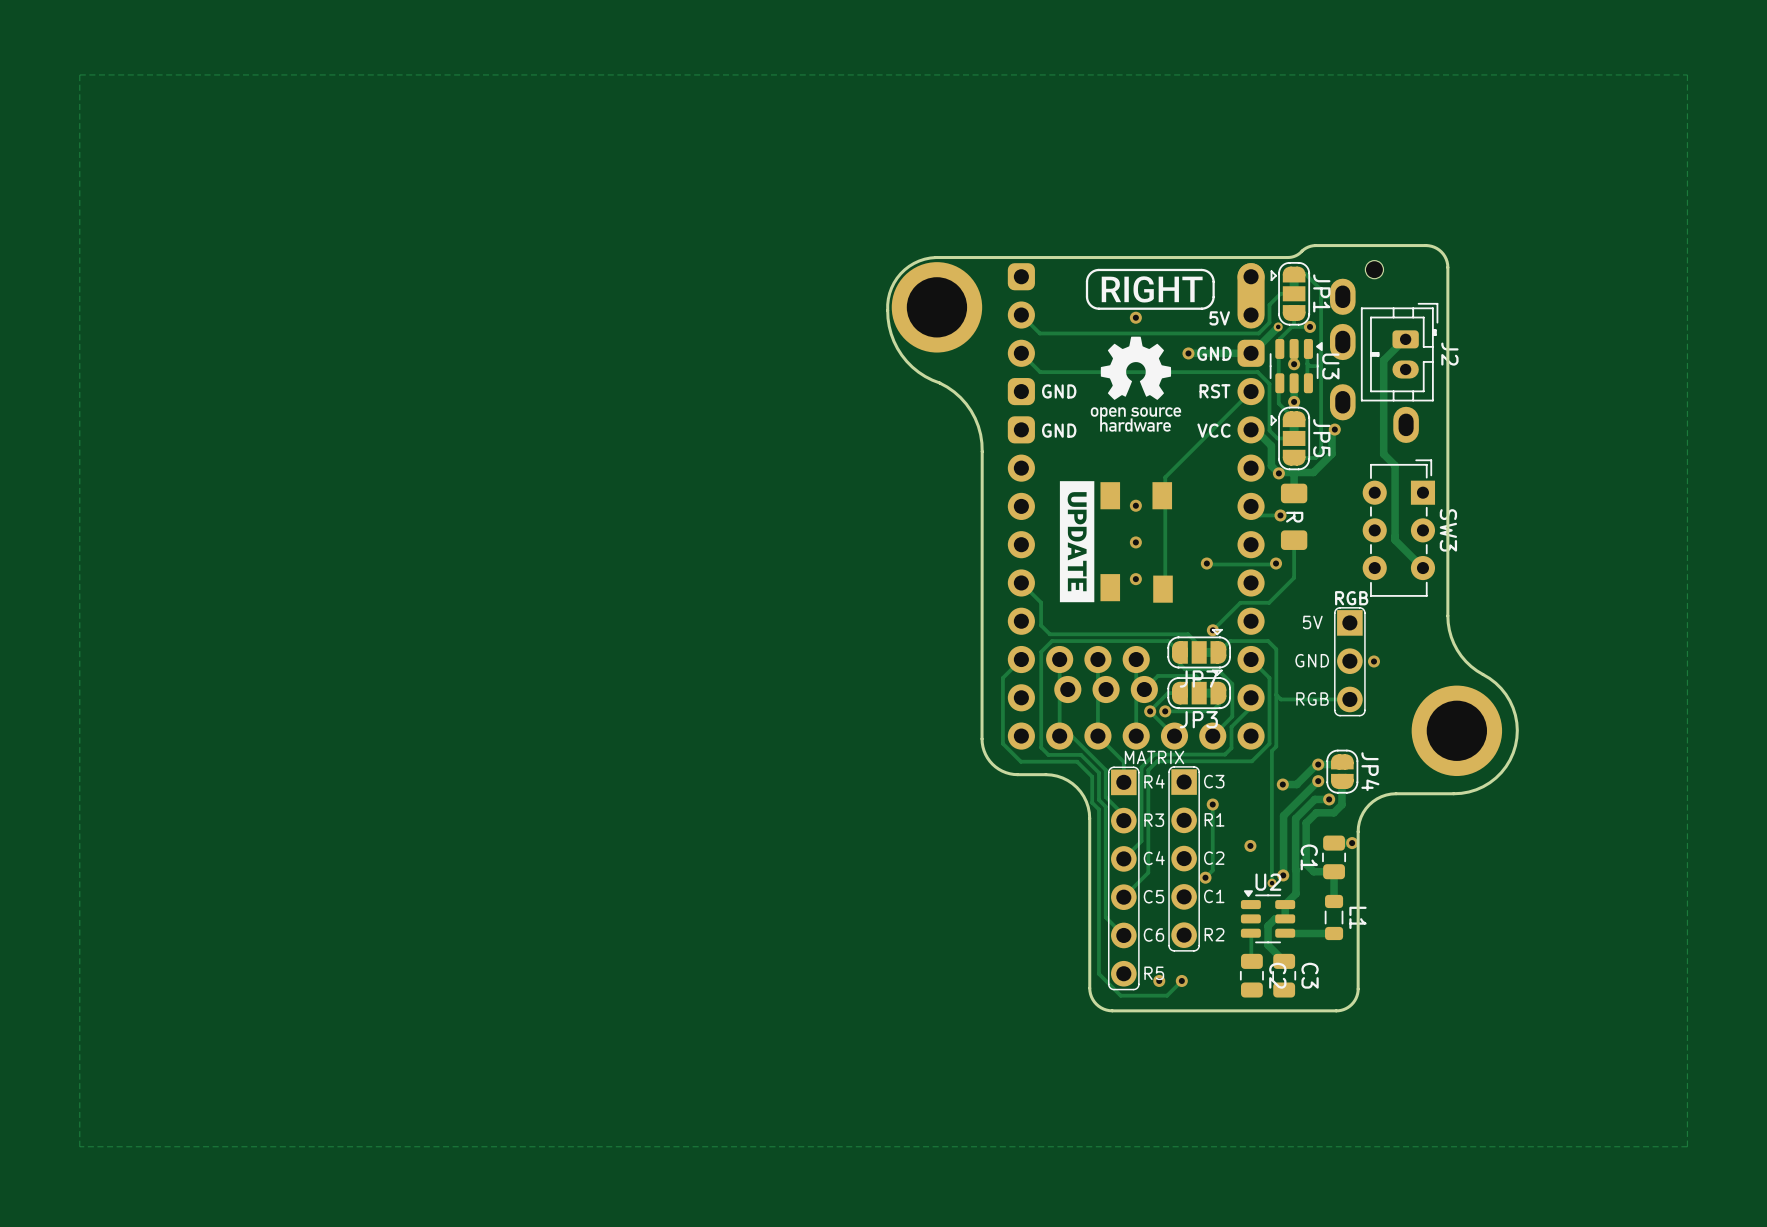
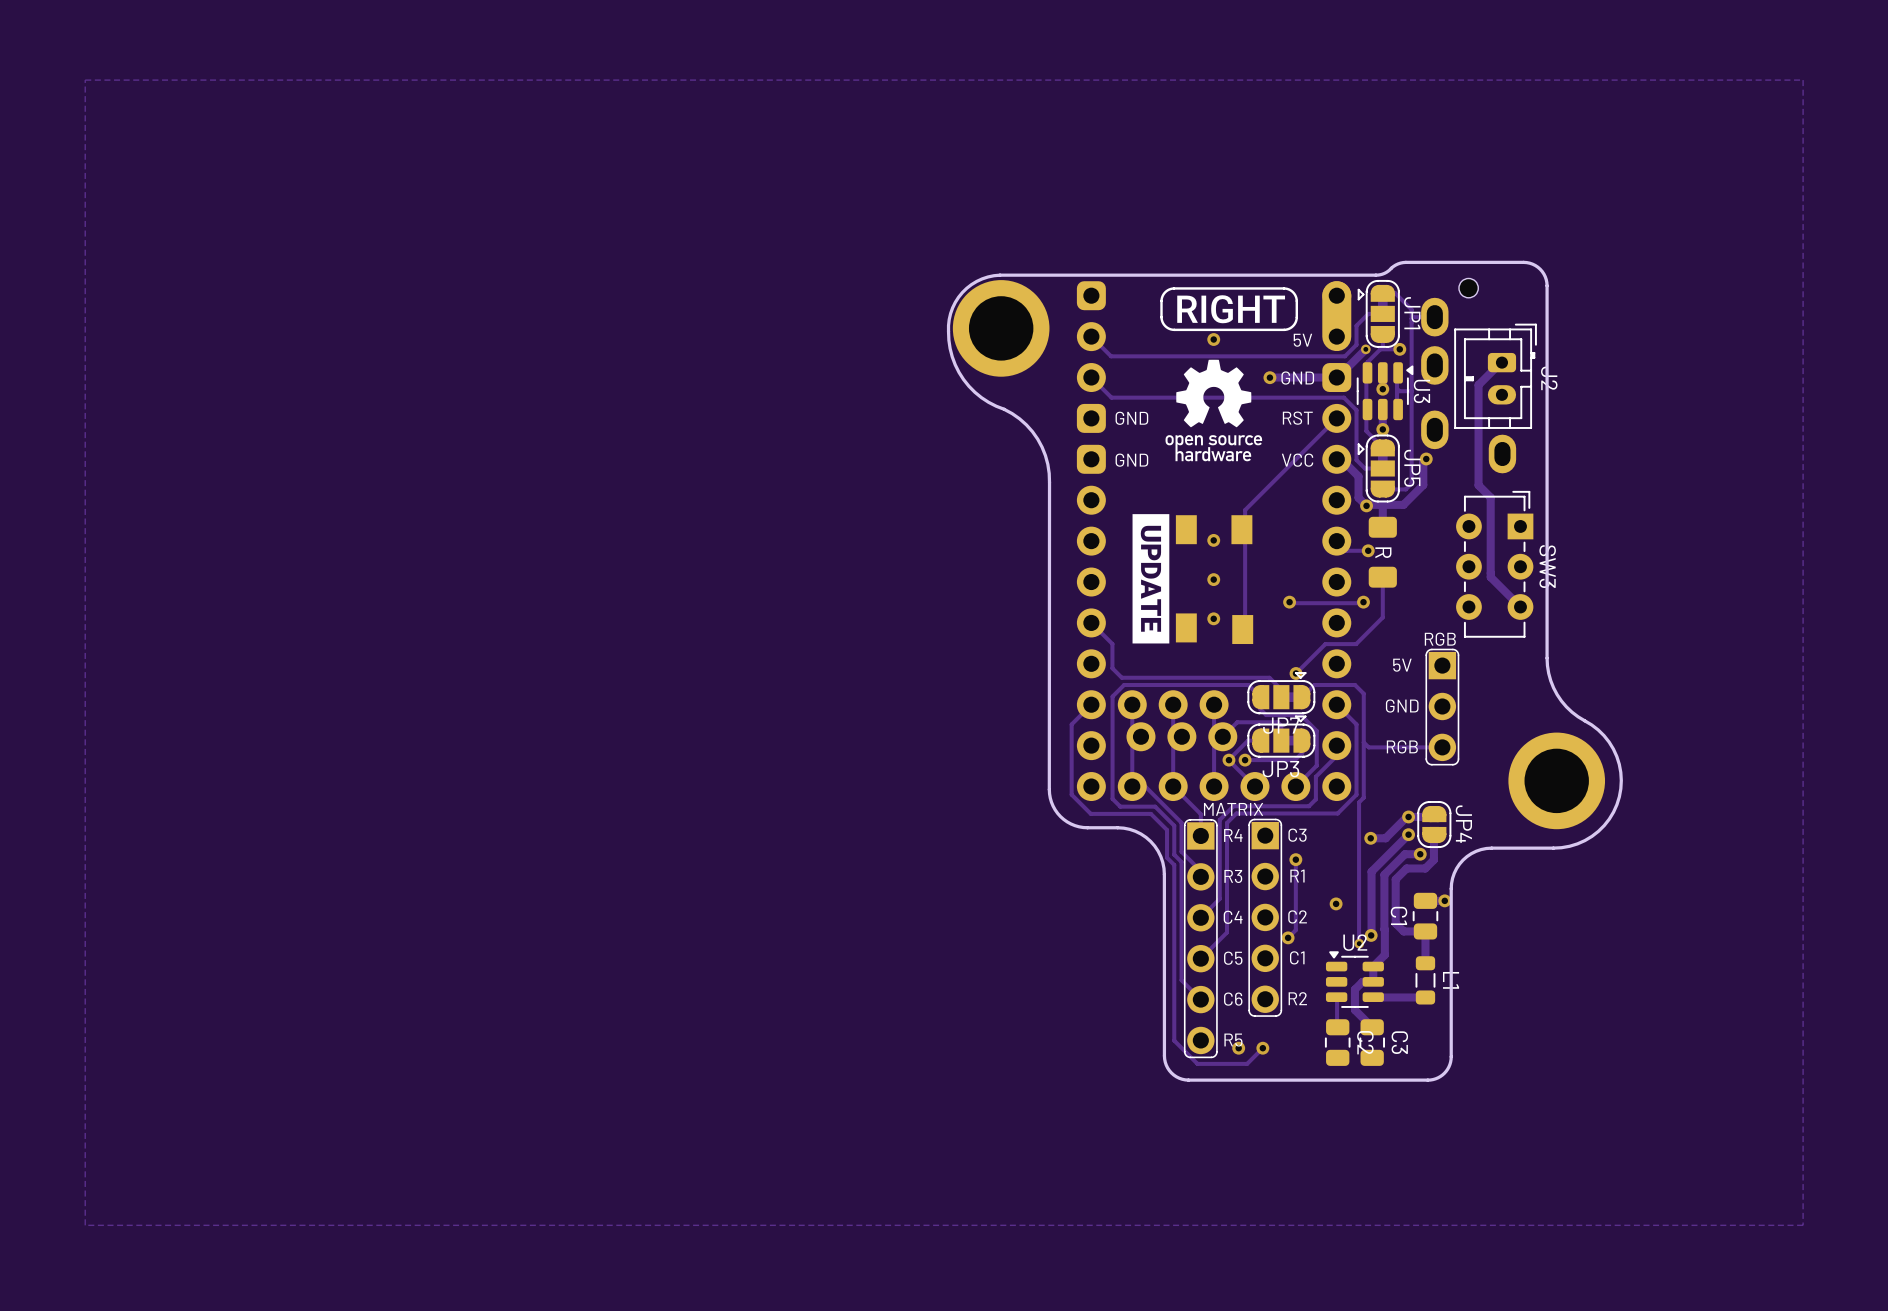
via: (1373, 661) -> none

